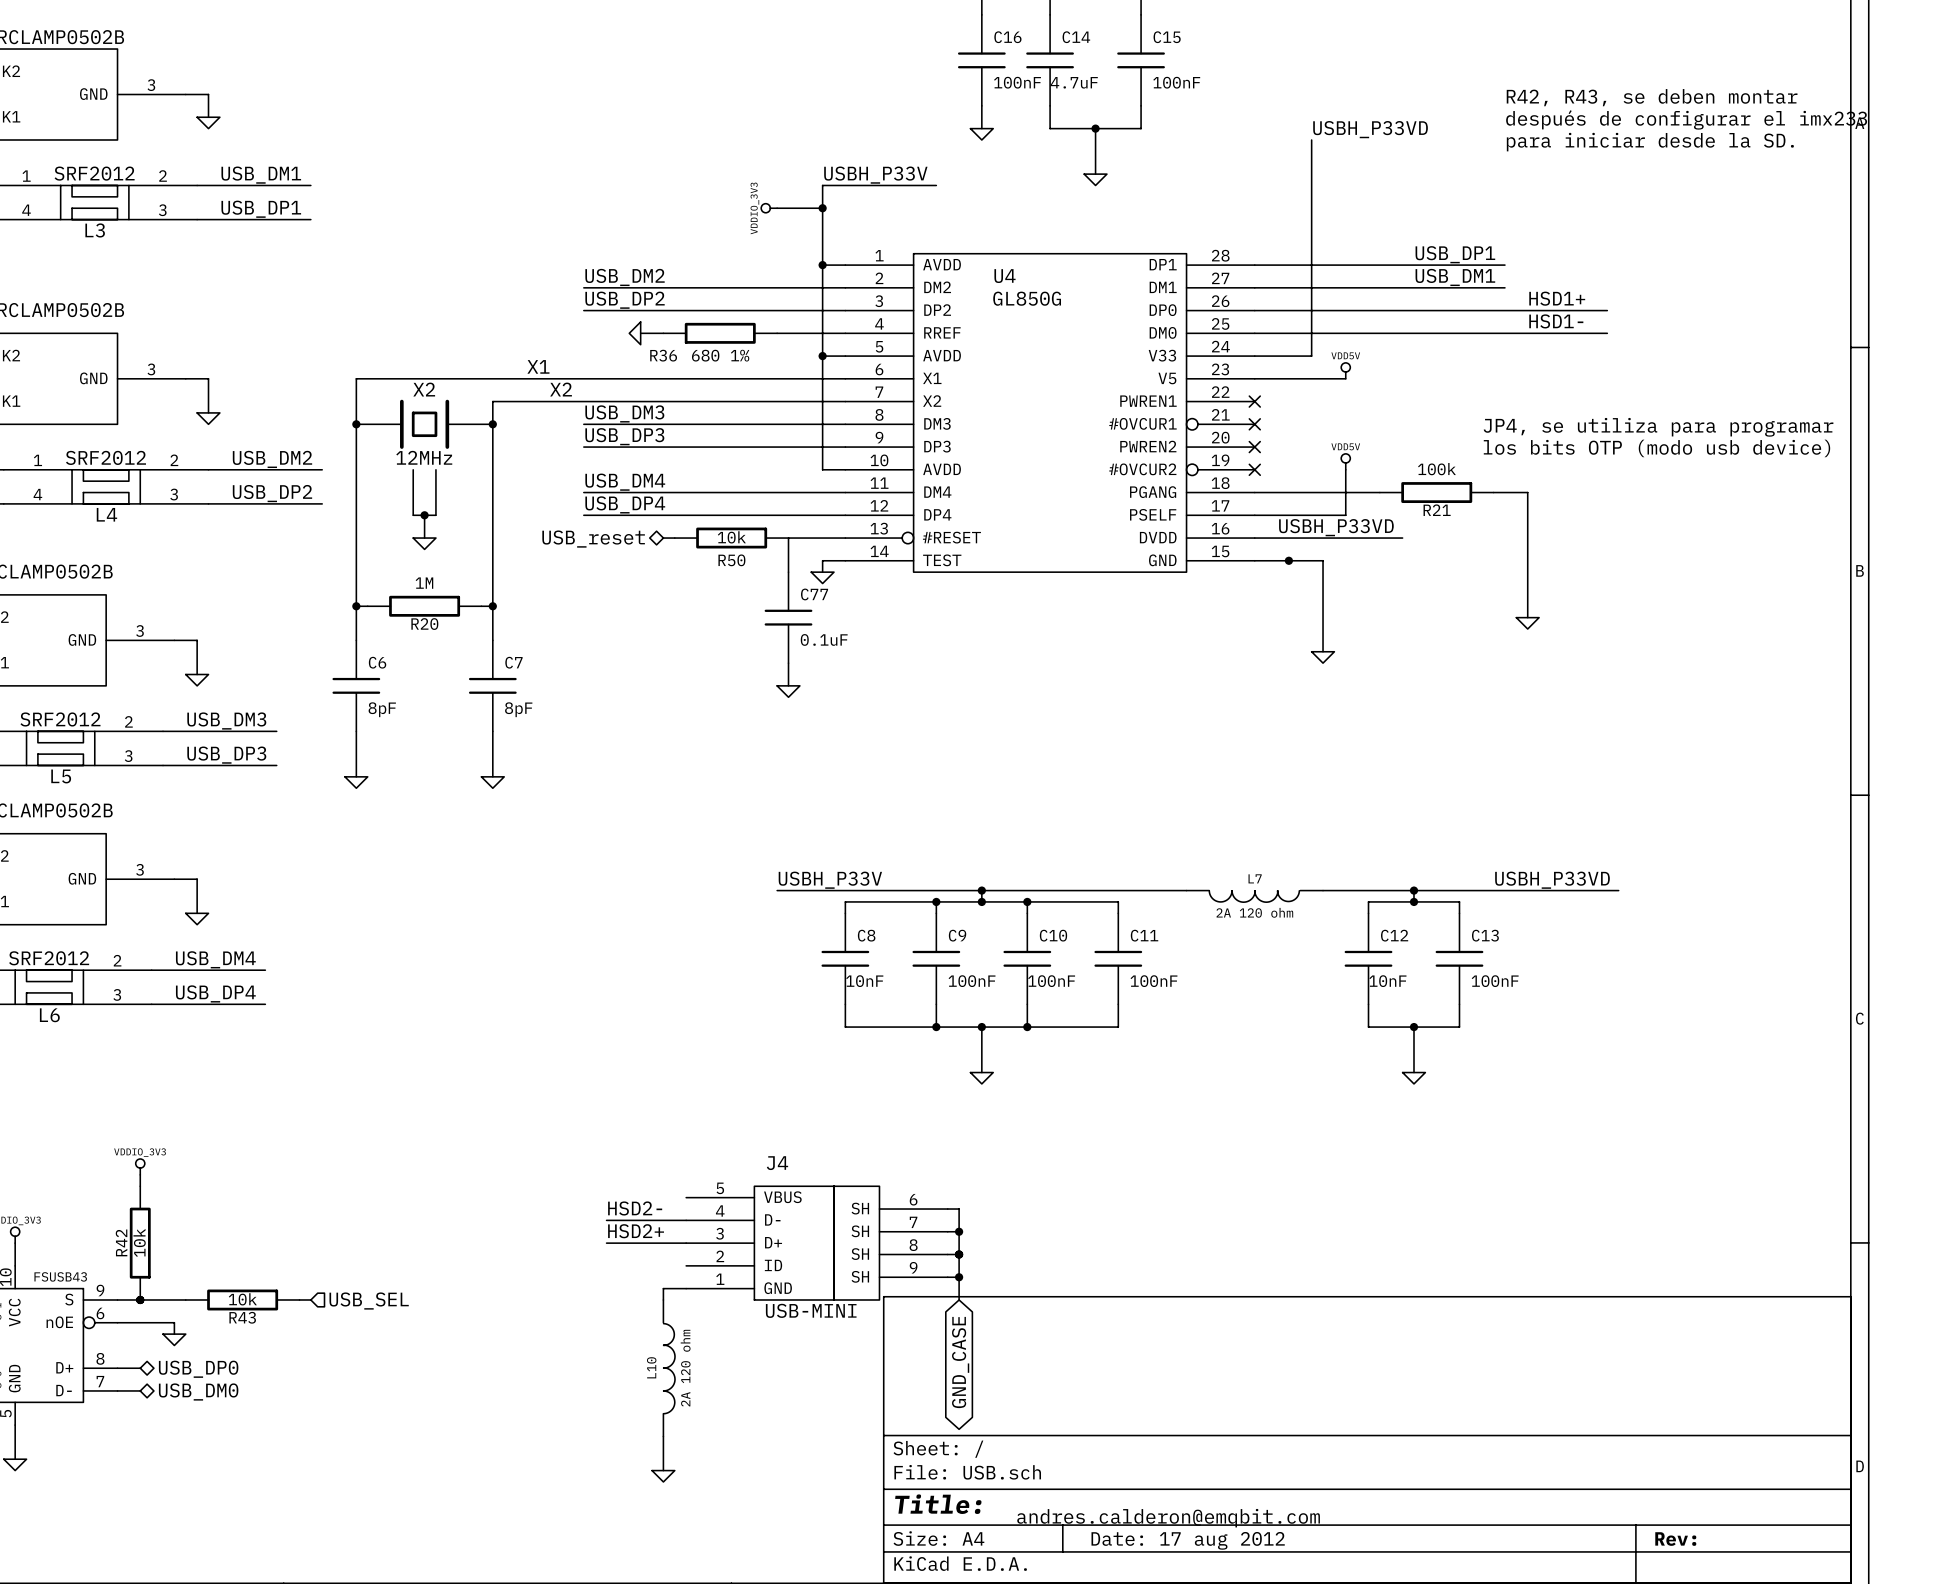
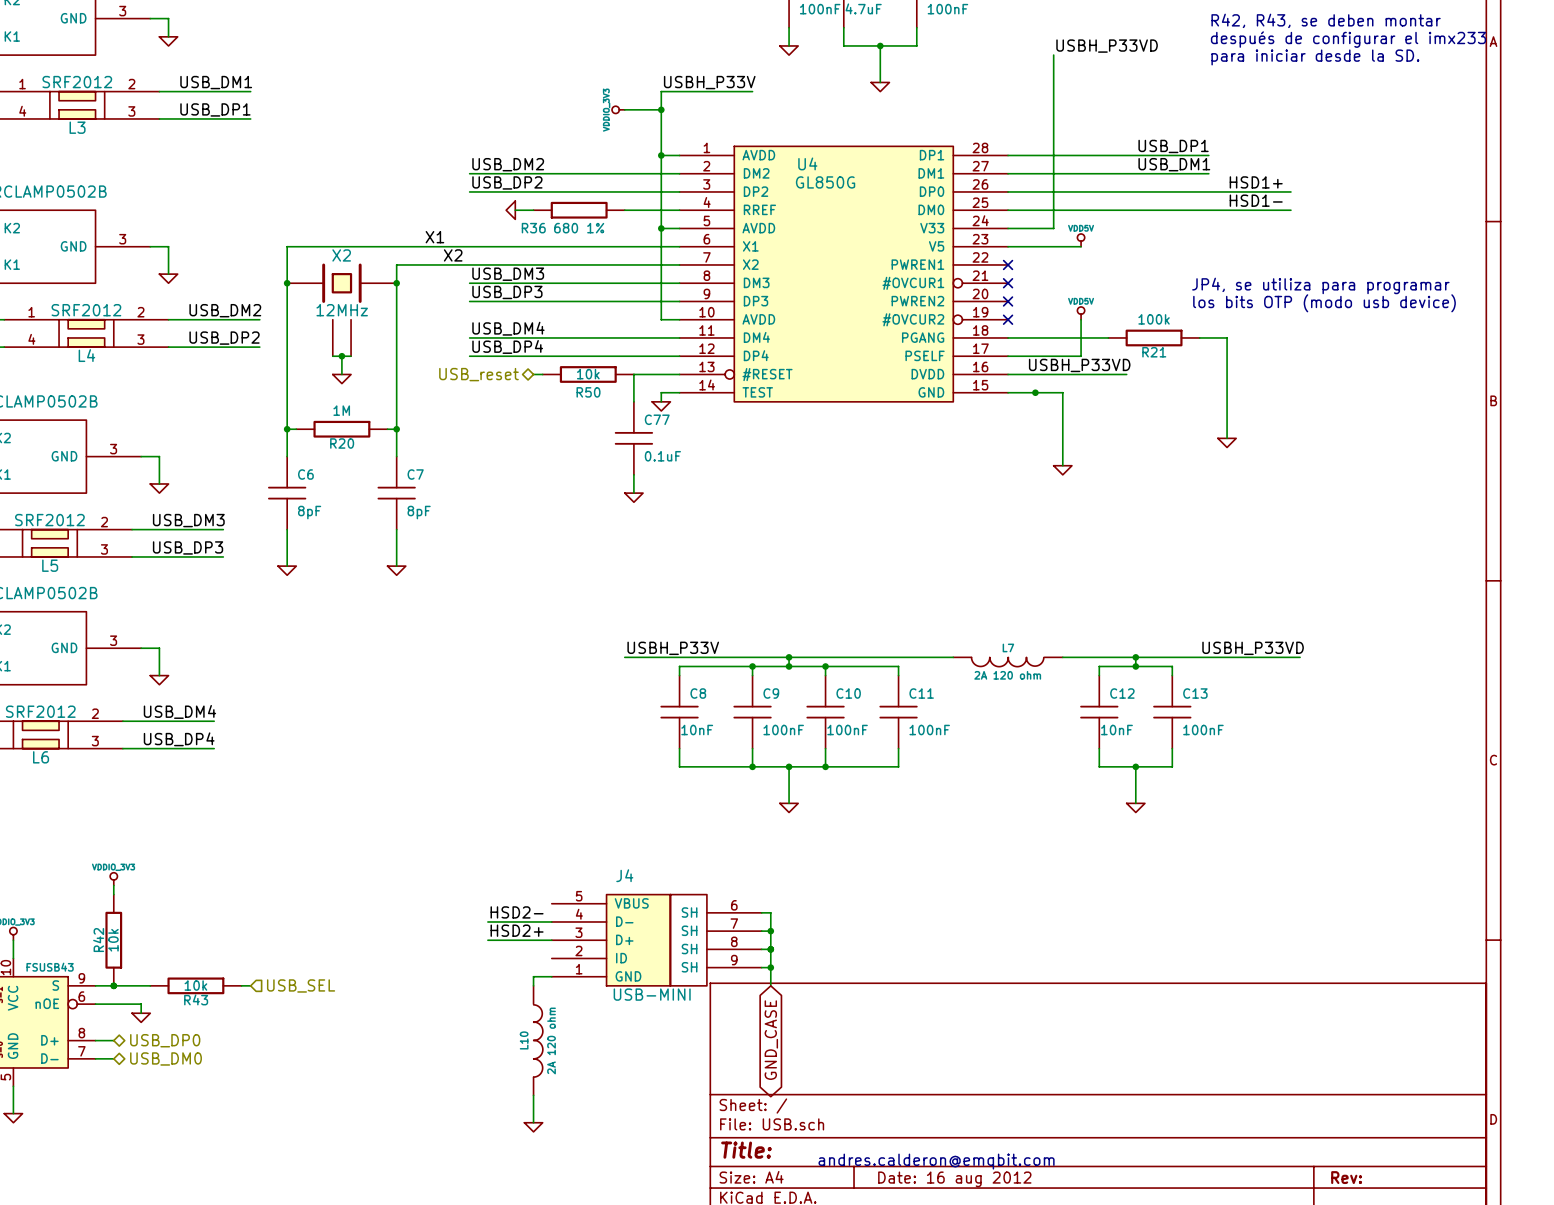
title block: Date: 17 aug 2012 (1188, 1540) -> Date: 16 aug 2012 (954, 1179)

